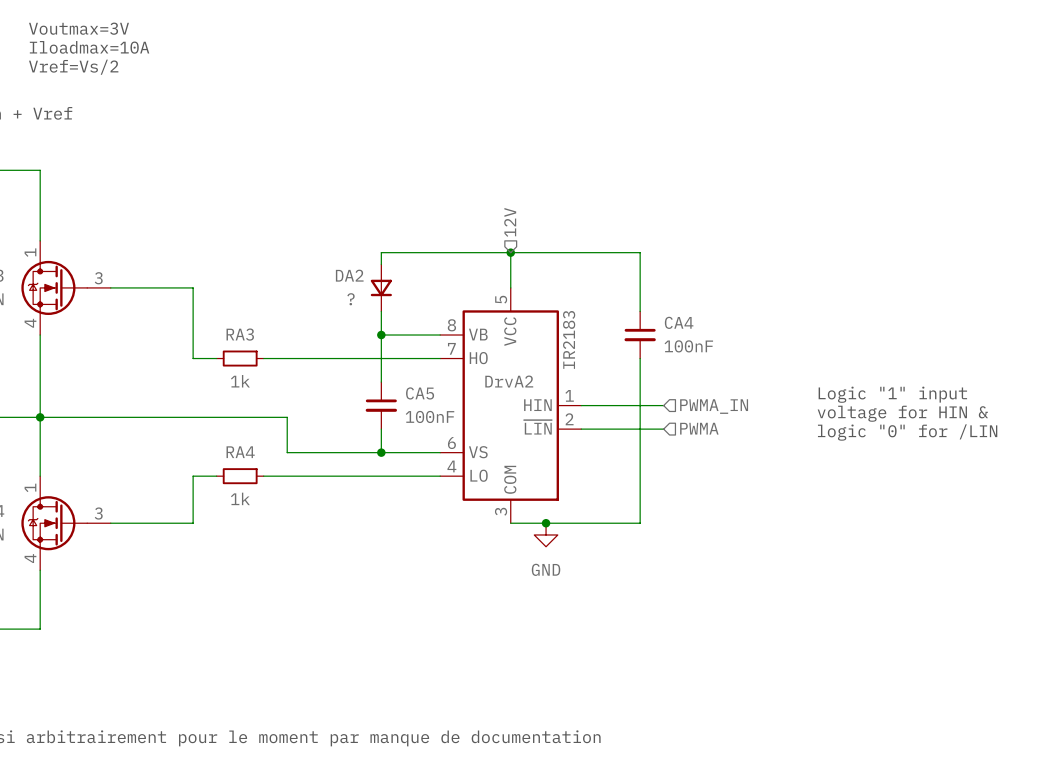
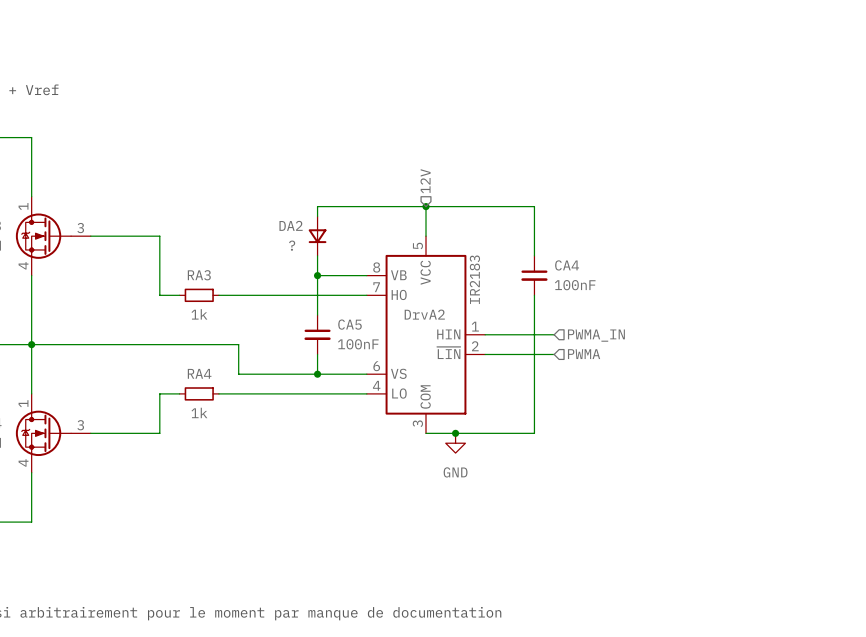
text: Voutmax=3V (78, 28) -> none
text: Iloadmax=10A (89, 47) -> none
text: Vref=Vs/2 (73, 67) -> none
text: Logic "1" input (892, 394) -> none
text: voltage for HIN & (902, 413) -> none
text: logic "0" for /LIN (907, 432) -> none

